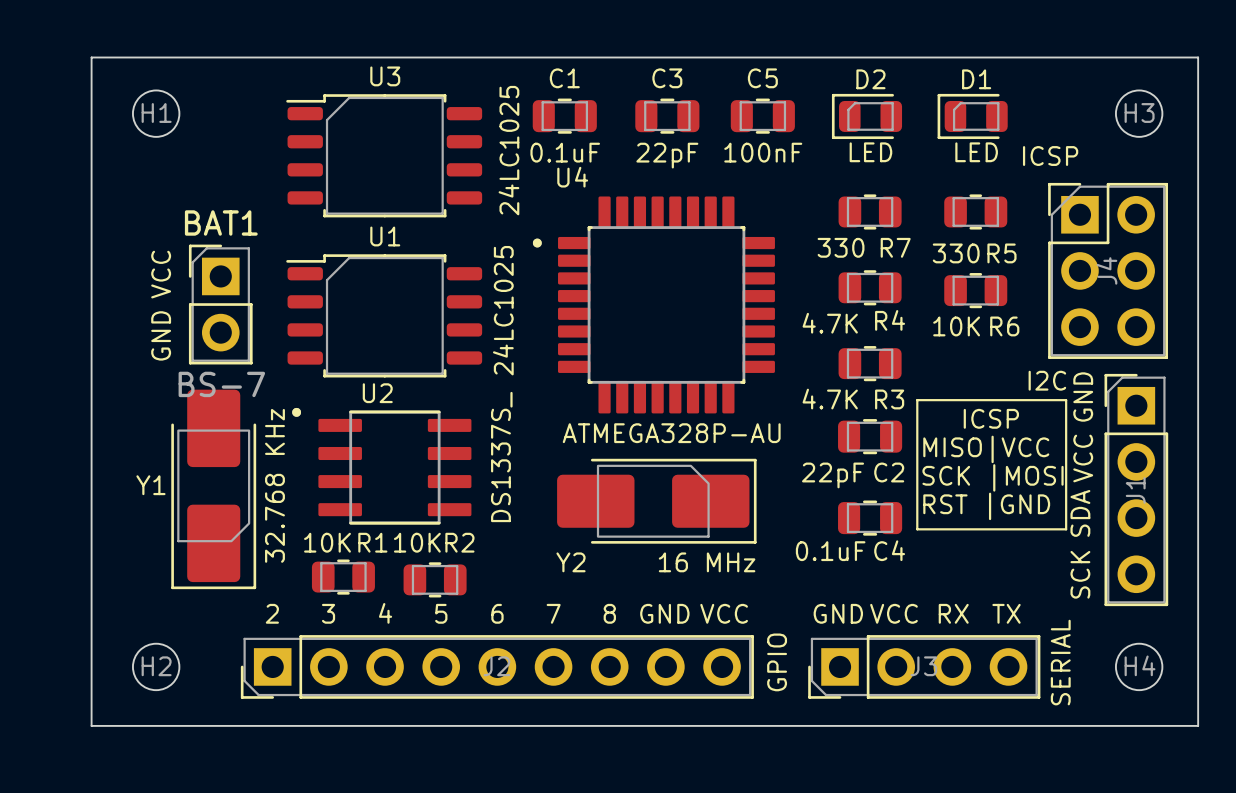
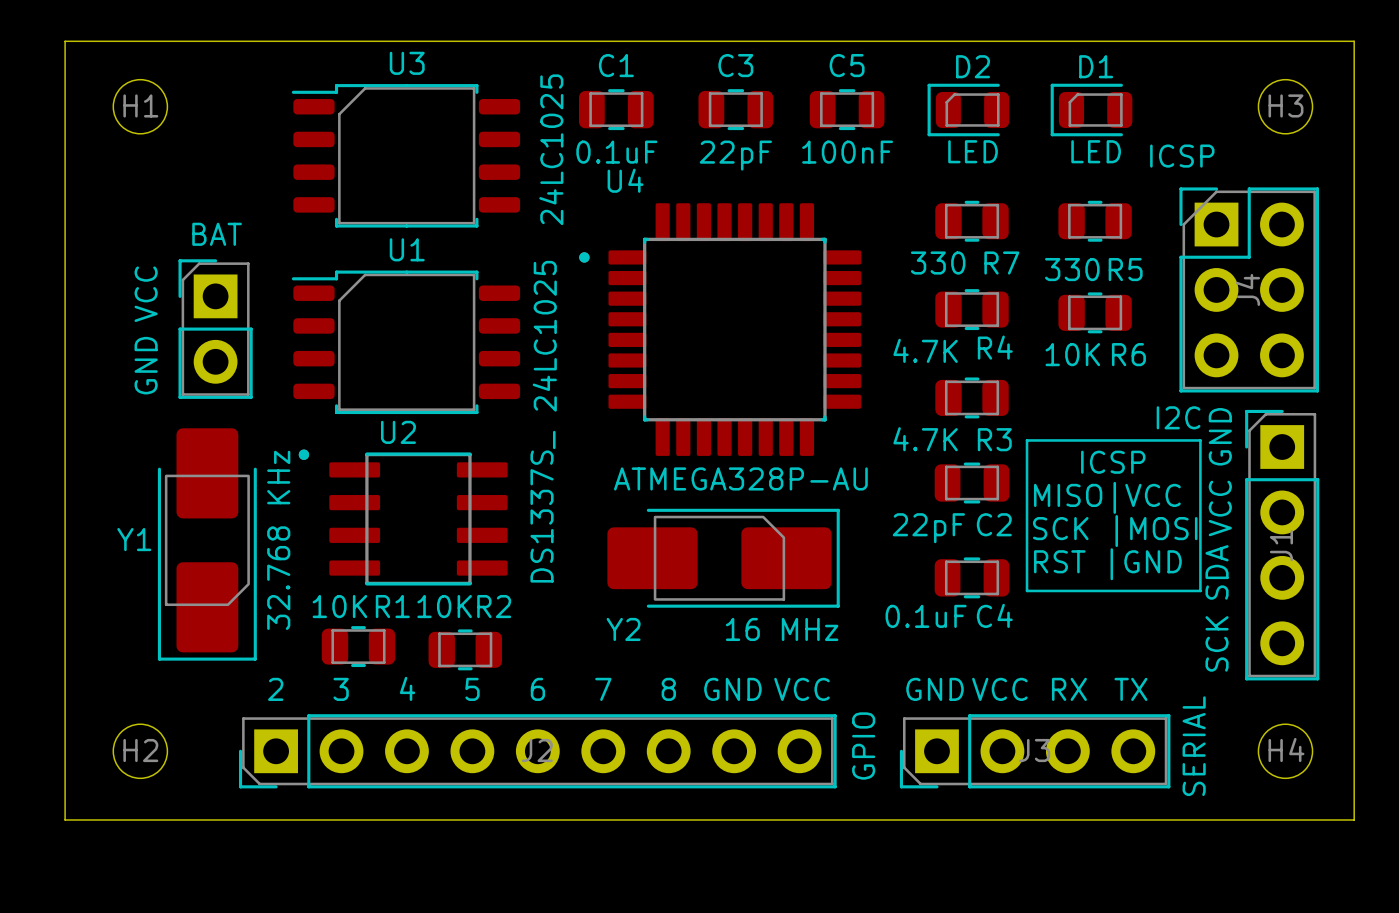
BAT1 name: BAT1 (221, 222) -> BAT (217, 234)
BAT1 value: BS-7 (221, 384) -> none

